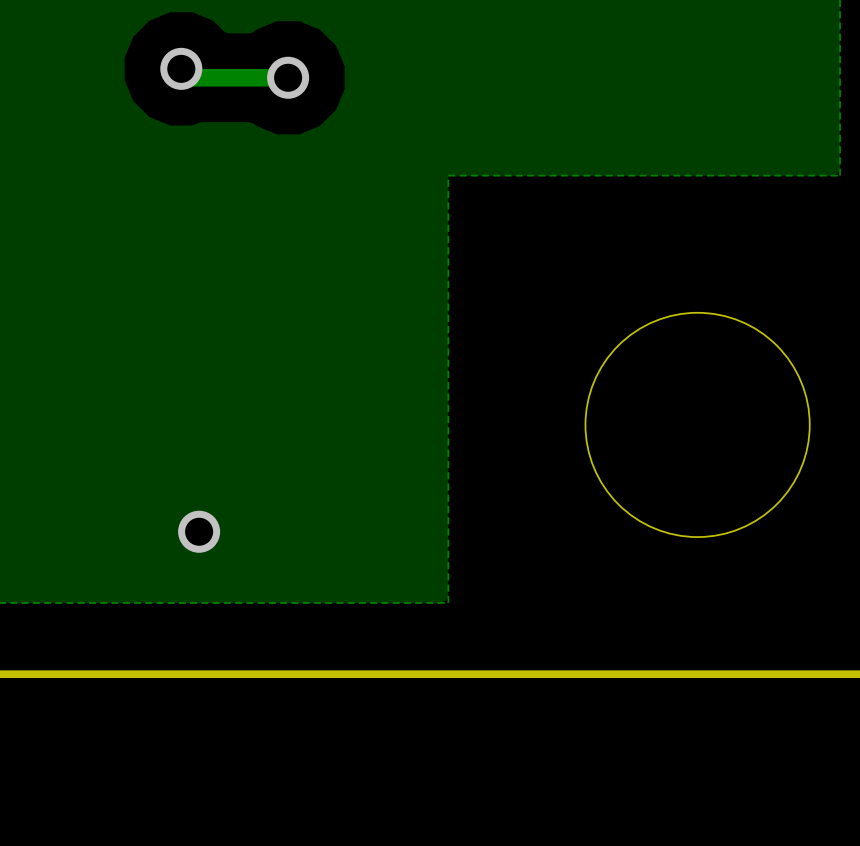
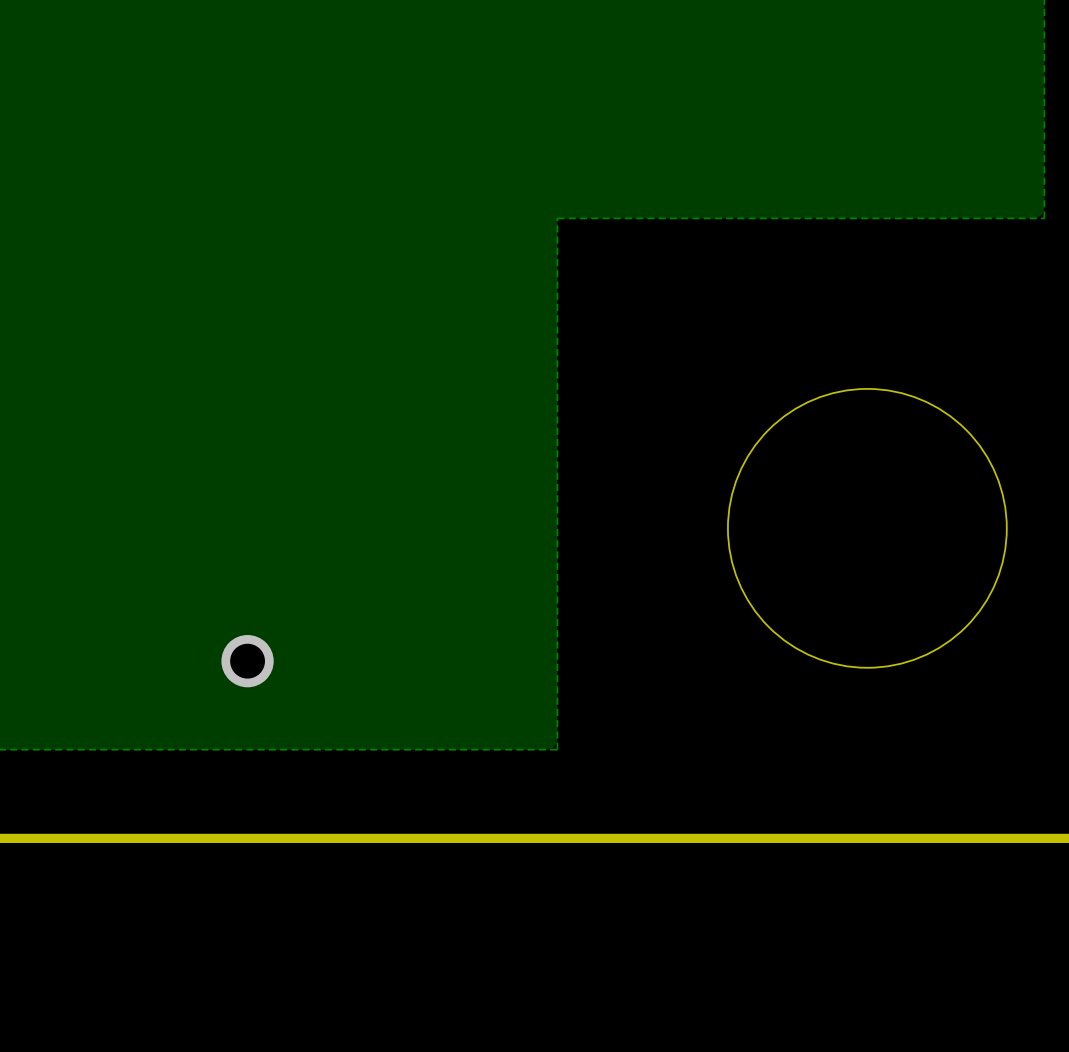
track: (181, 68) (190, 77) (288, 77) -> none
via: (181, 68) -> none
via: (288, 77) -> none

